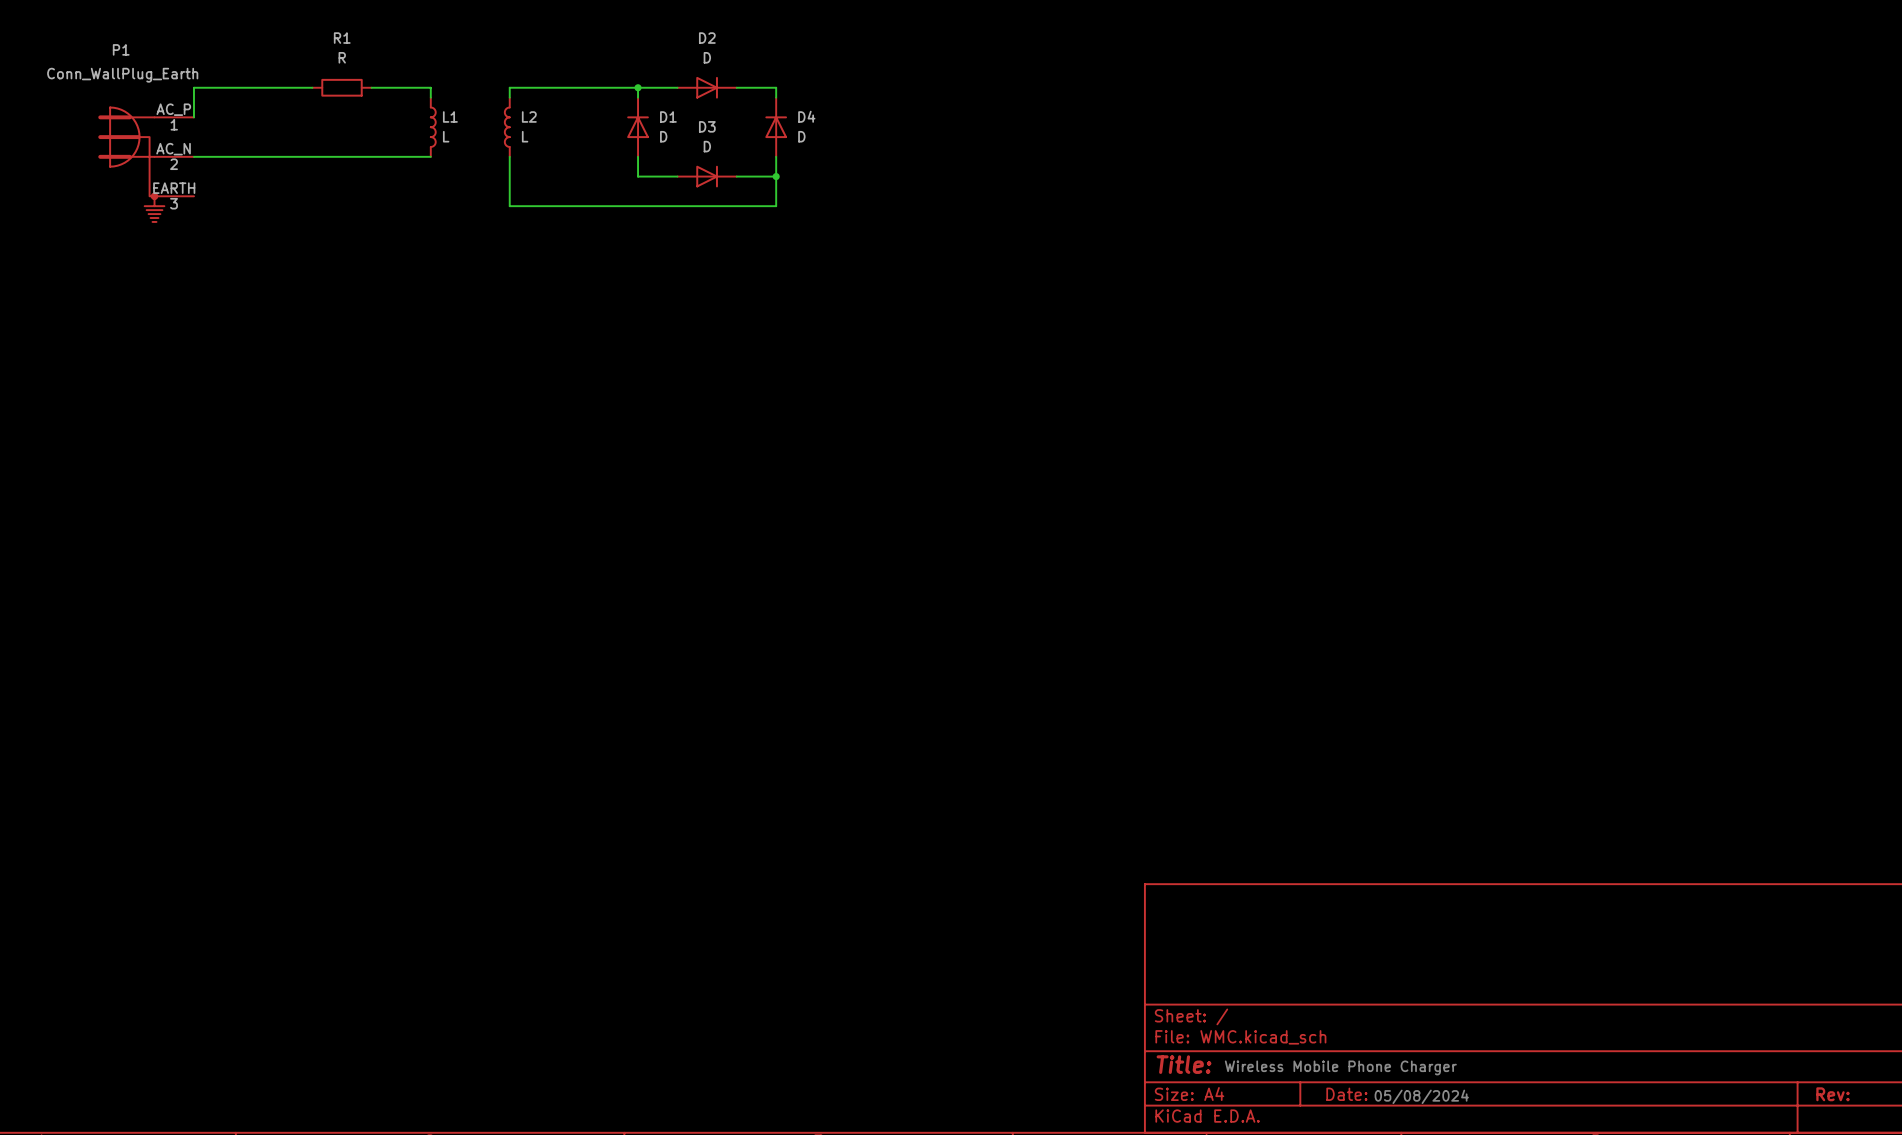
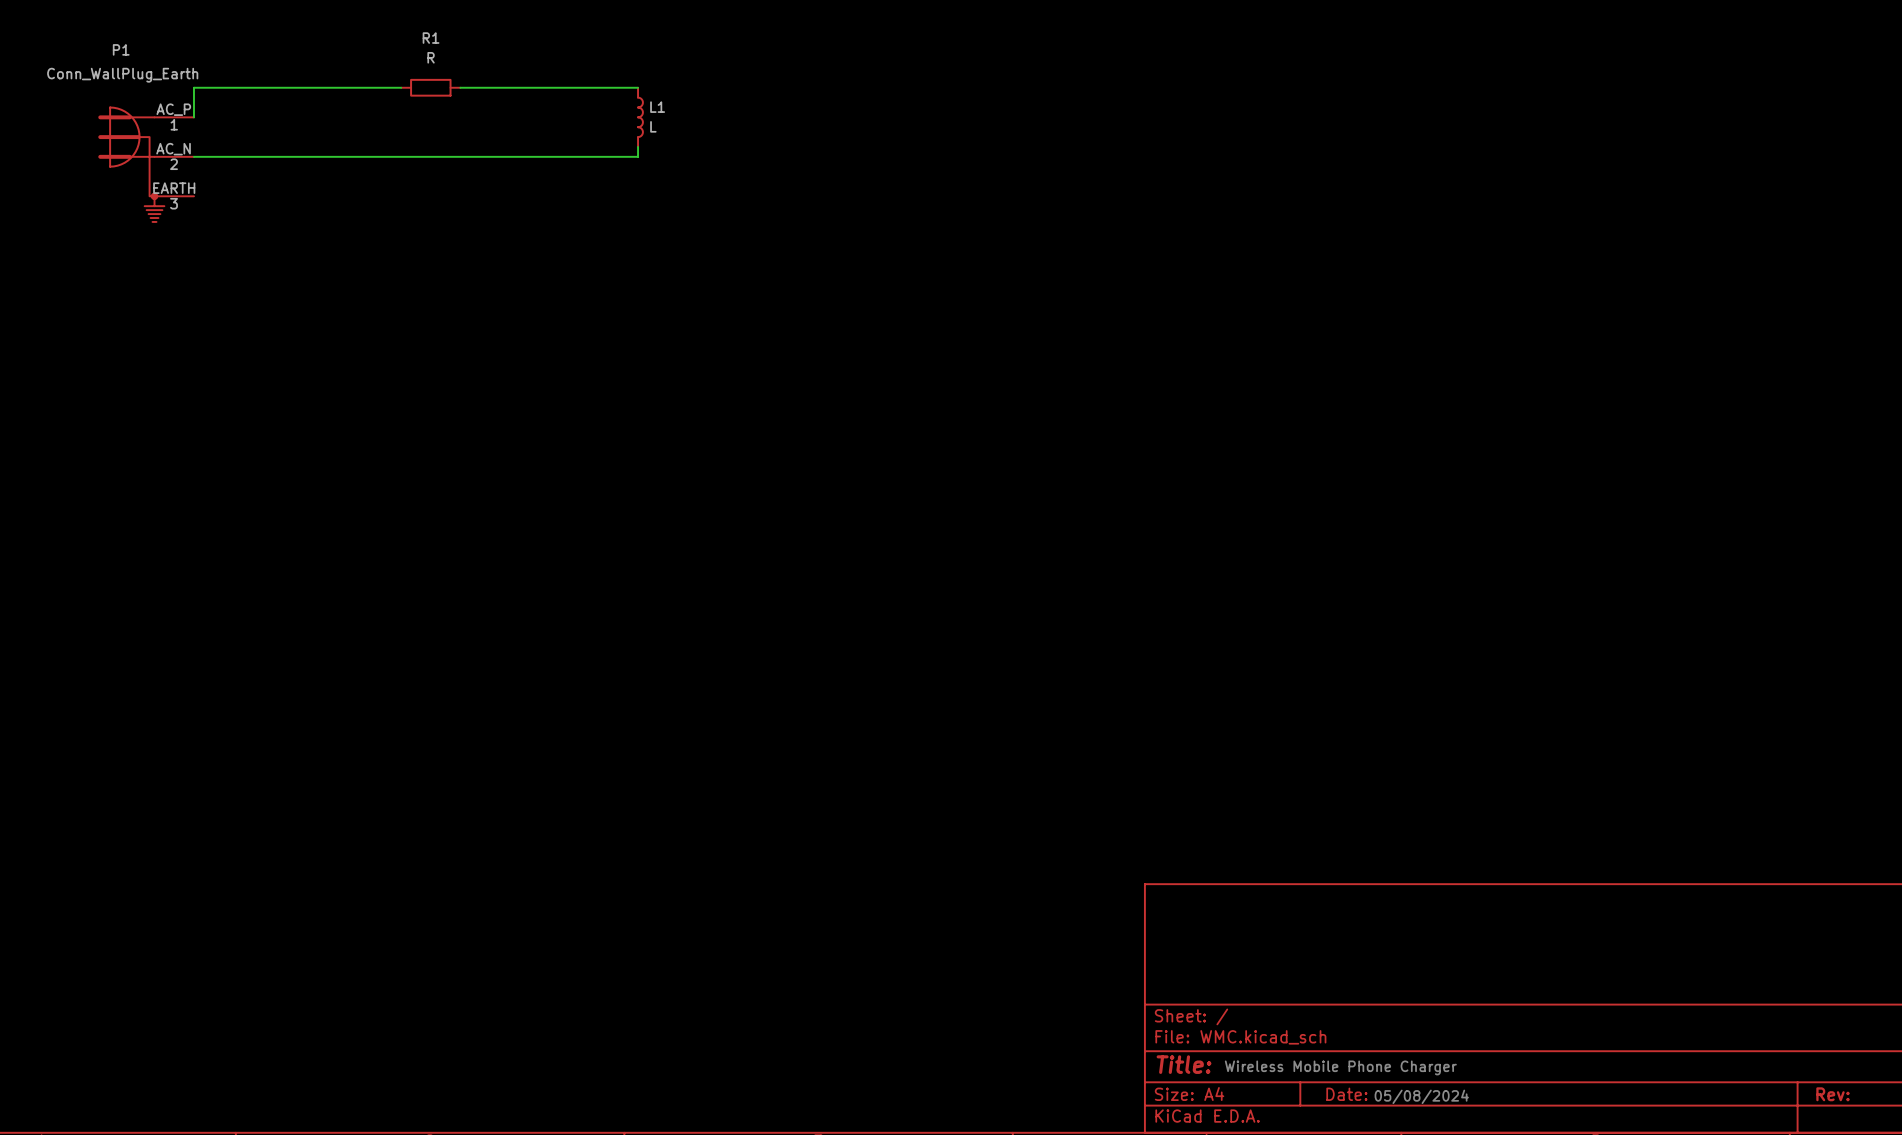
wire: none -> (312, 87) (371, 87)
R1 position: (342, 87) -> (430, 87)
wire: (401, 87) (430, 87) (430, 97) -> none
wire: (509, 87) (509, 97) -> (509, 87) (460, 87)
junction: (638, 87) -> none
wire: (677, 87) (638, 87) (638, 97) -> none
D2: D (707, 87) -> none
wire: (736, 87) (776, 87) (776, 97) -> none
L1 position: (433, 127) -> (640, 117)
L2: L (507, 127) -> none
D1: D (638, 127) -> none
D4: D (776, 127) -> none
wire: none -> (638, 146) (638, 156) (430, 156)
wire: (509, 156) (509, 206) (776, 206) (776, 156) -> none
wire: (638, 156) (638, 176) (677, 176) -> none
D3: D (707, 176) -> none
wire: (736, 176) (776, 176) -> none
junction: (776, 176) -> none

